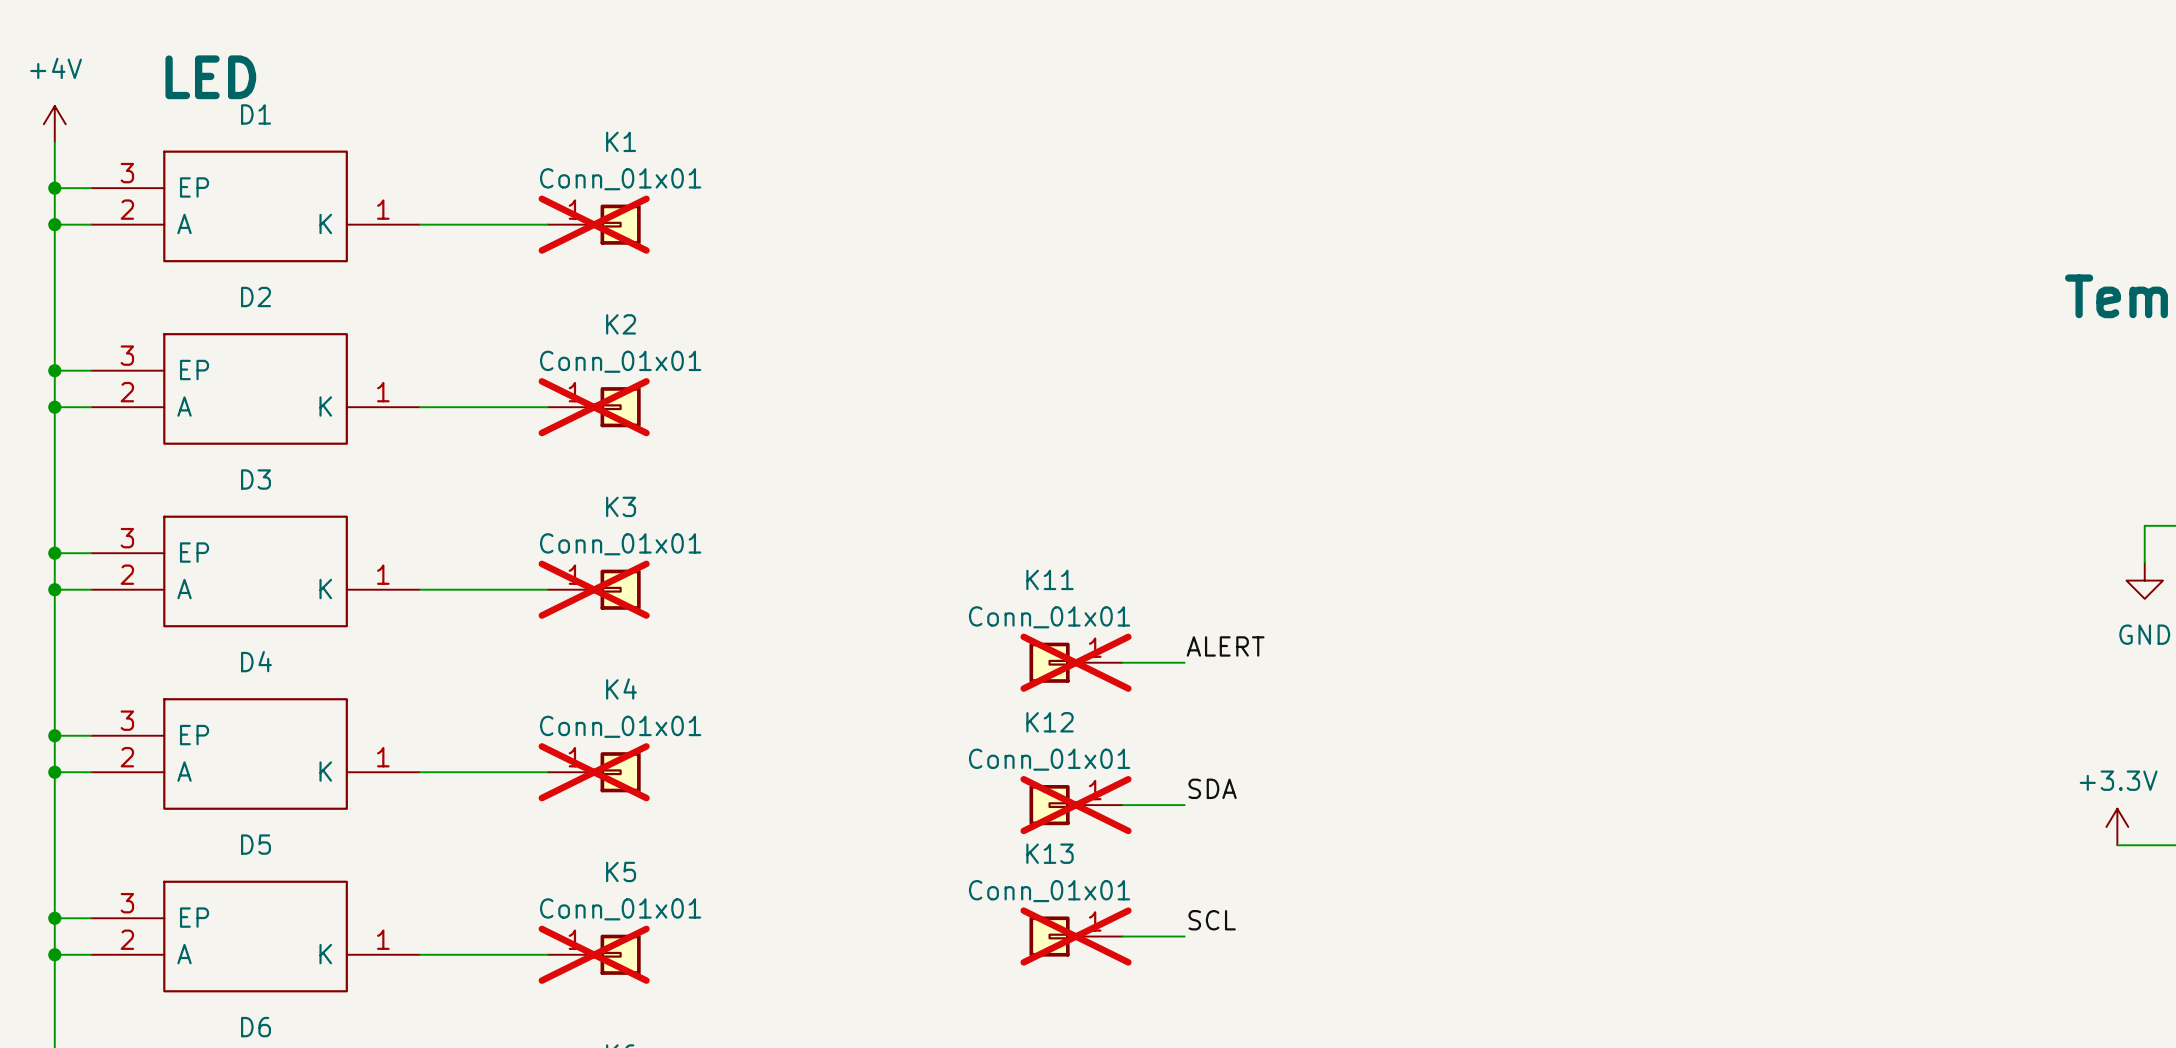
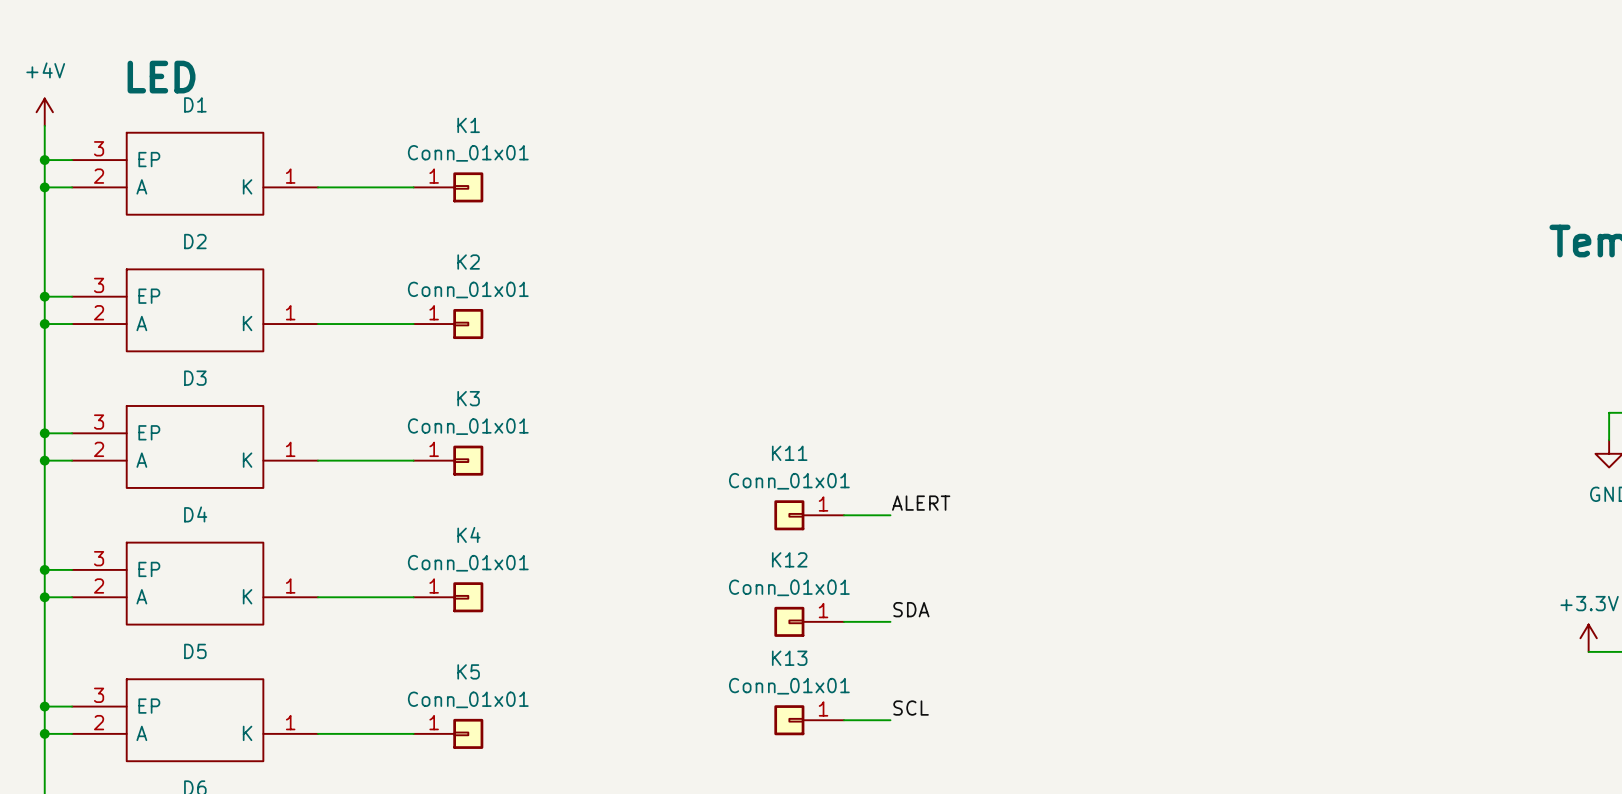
K1 do-not-place cross: (594, 224) -> none
K2 do-not-place cross: (594, 407) -> none
K3 do-not-place cross: (594, 589) -> none
K11 do-not-place cross: (1076, 662) -> none
K4 do-not-place cross: (594, 772) -> none
K12 do-not-place cross: (1076, 805) -> none
K13 do-not-place cross: (1076, 936) -> none
K5 do-not-place cross: (594, 954) -> none

